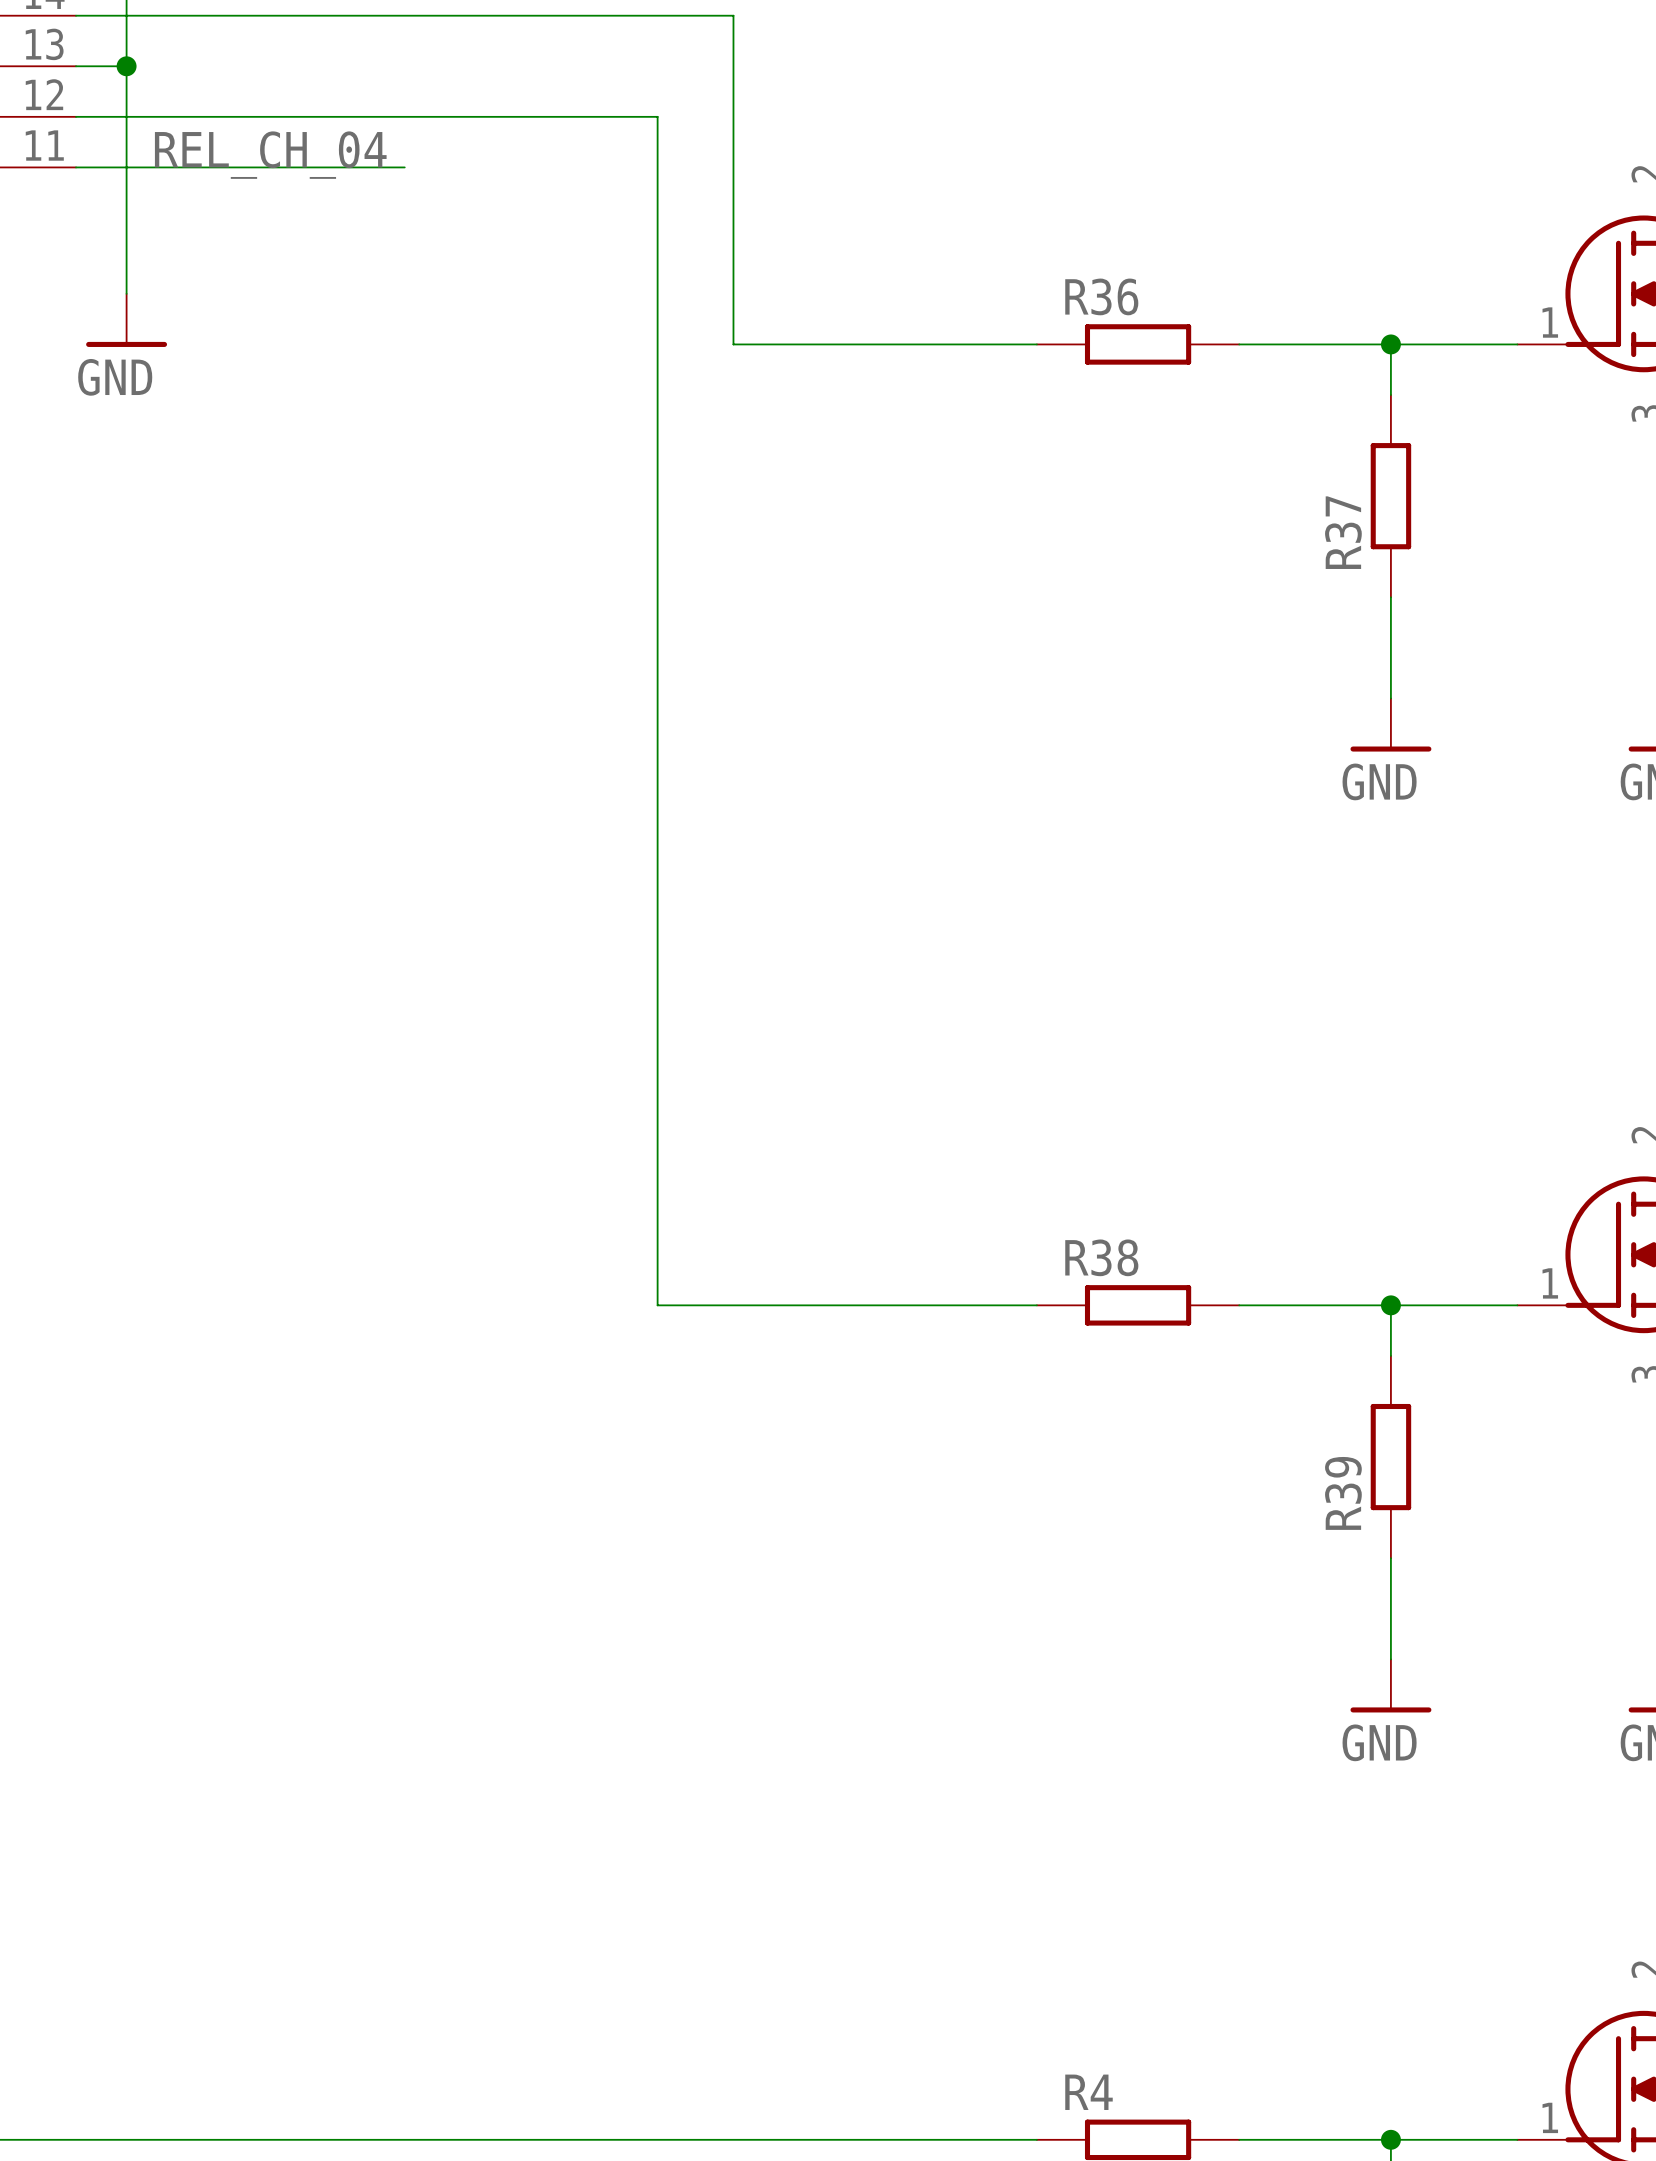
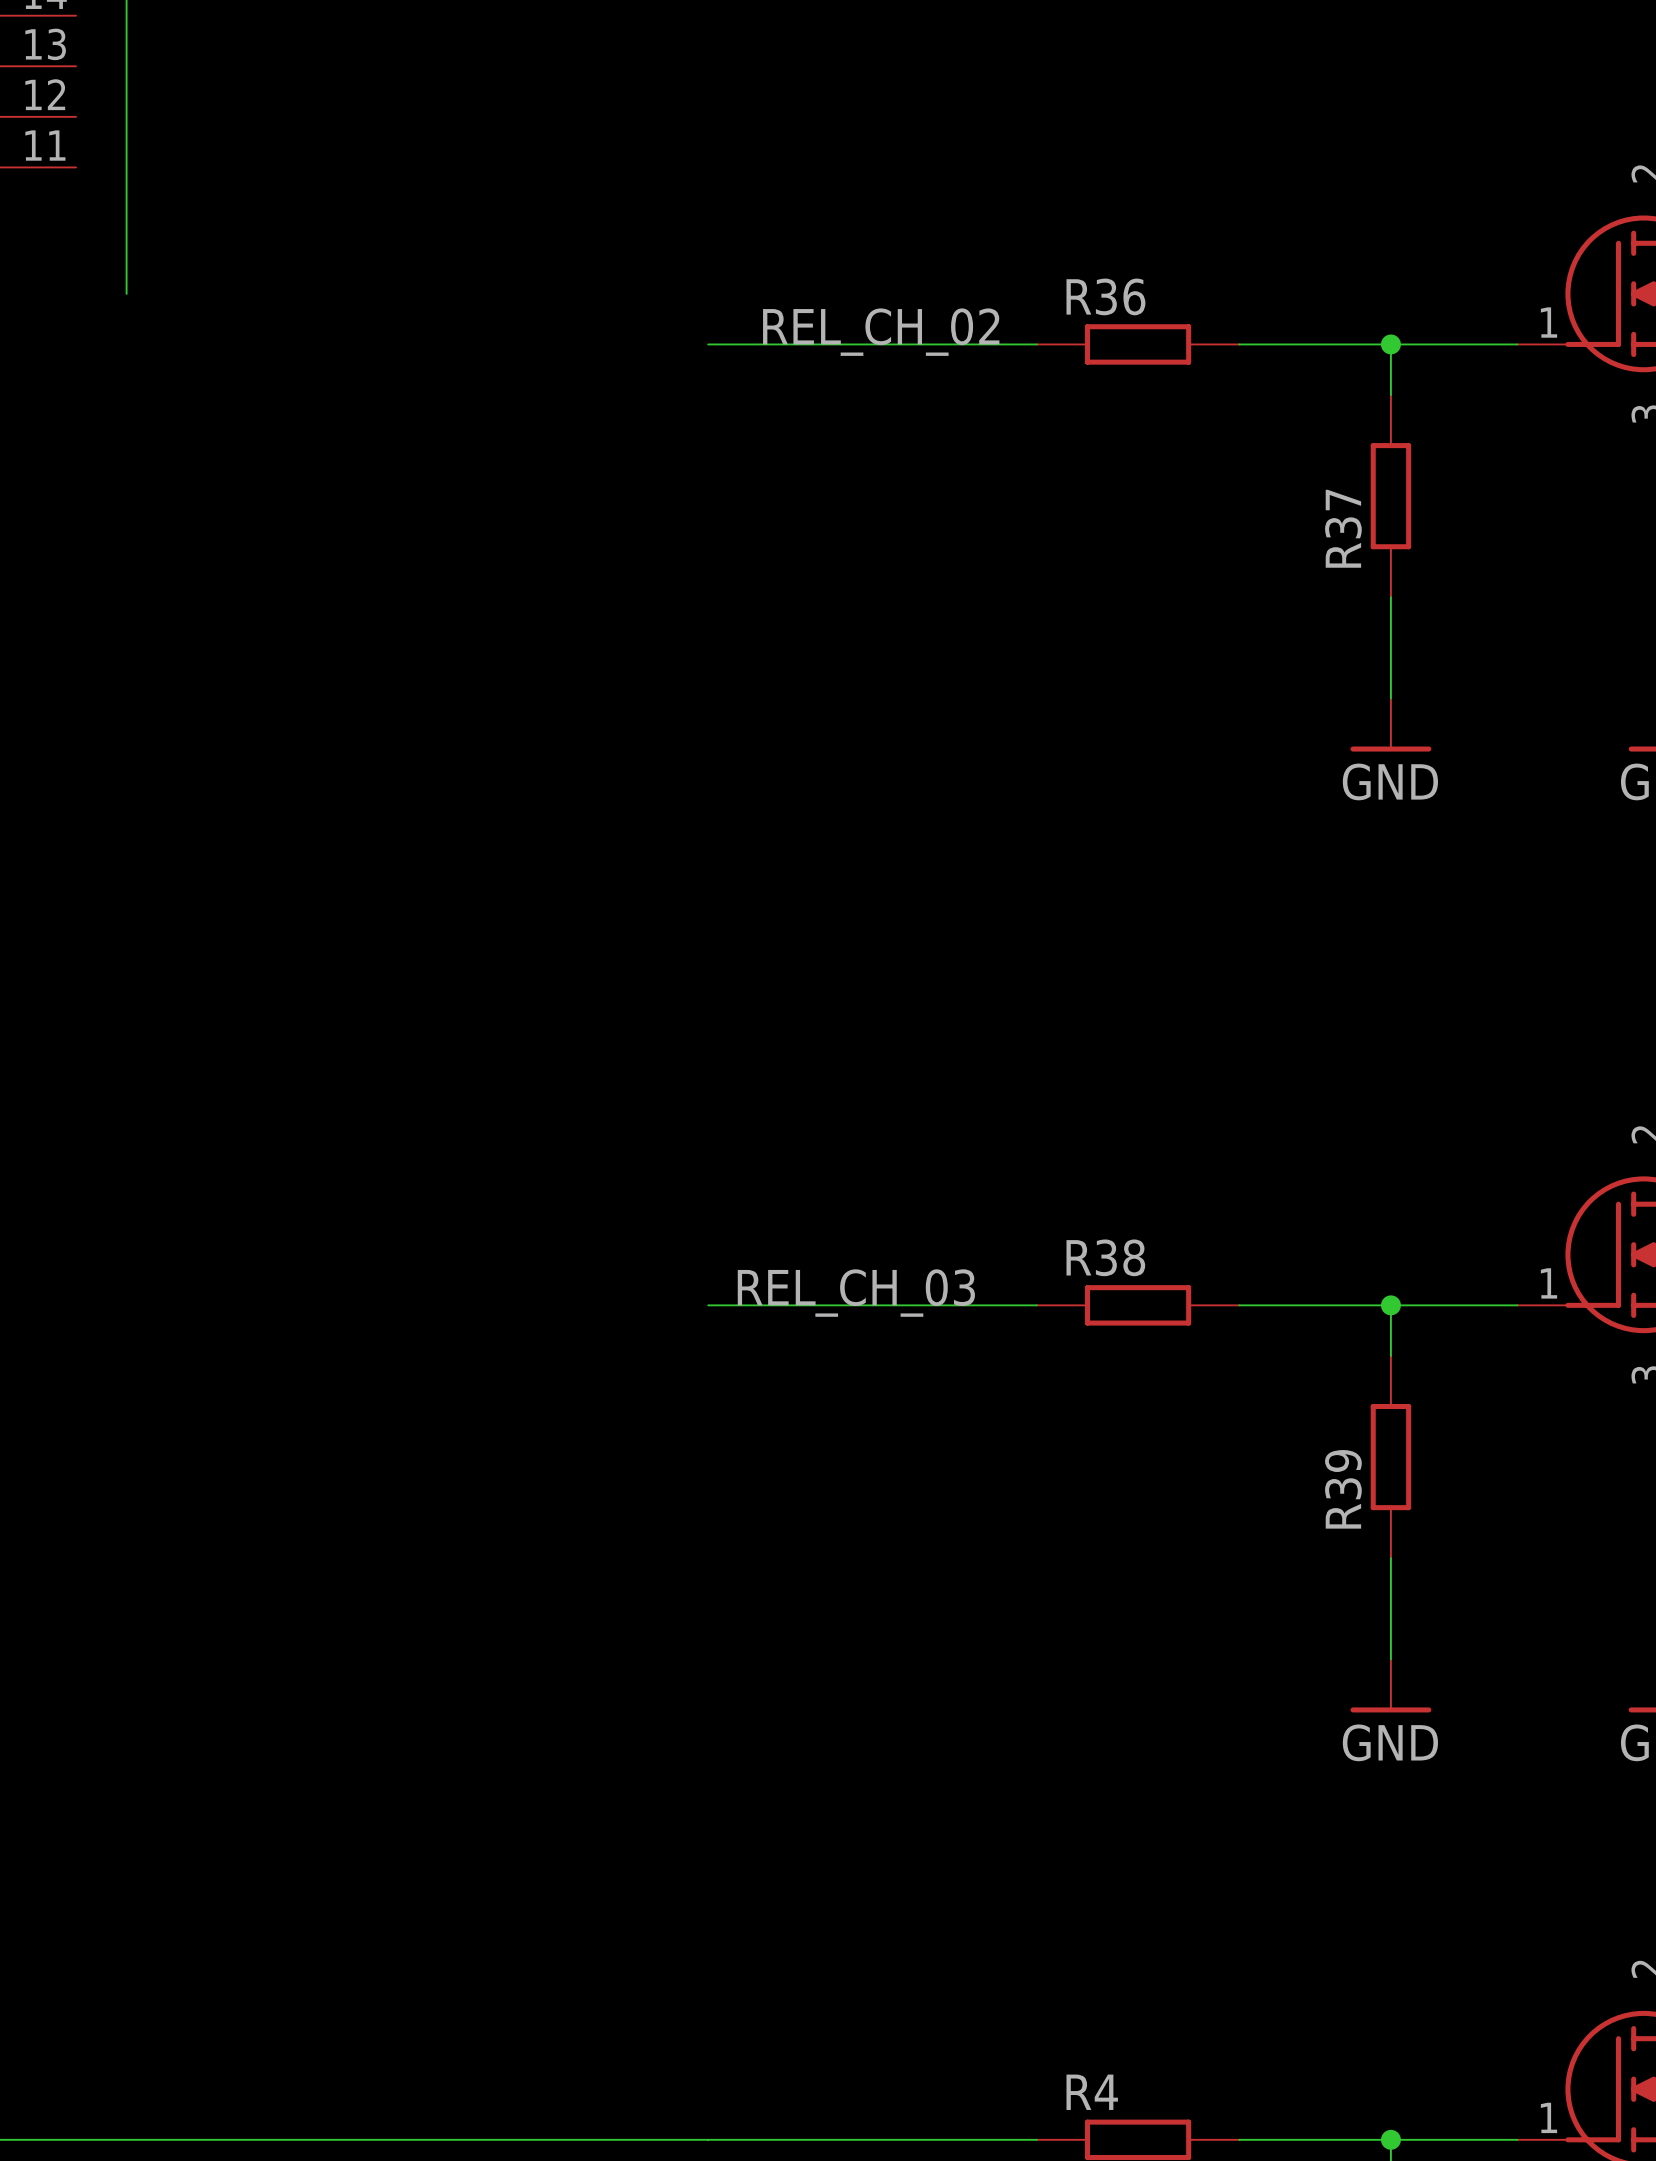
wire: (76, 15) (733, 15) (733, 344) -> (708, 344) (733, 344)
wire: (76, 66) (126, 66) -> none
junction: (126, 66) -> none
wire: (76, 116) (657, 116) (657, 1305) (708, 1305) -> none
label: REL_CH_04 (270, 155) -> none
wire: (76, 167) (404, 167) -> none
power symbol: GND (126, 320) -> none
label: none -> REL_CH_02 (881, 332)
label: none -> REL_CH_03 (856, 1293)

